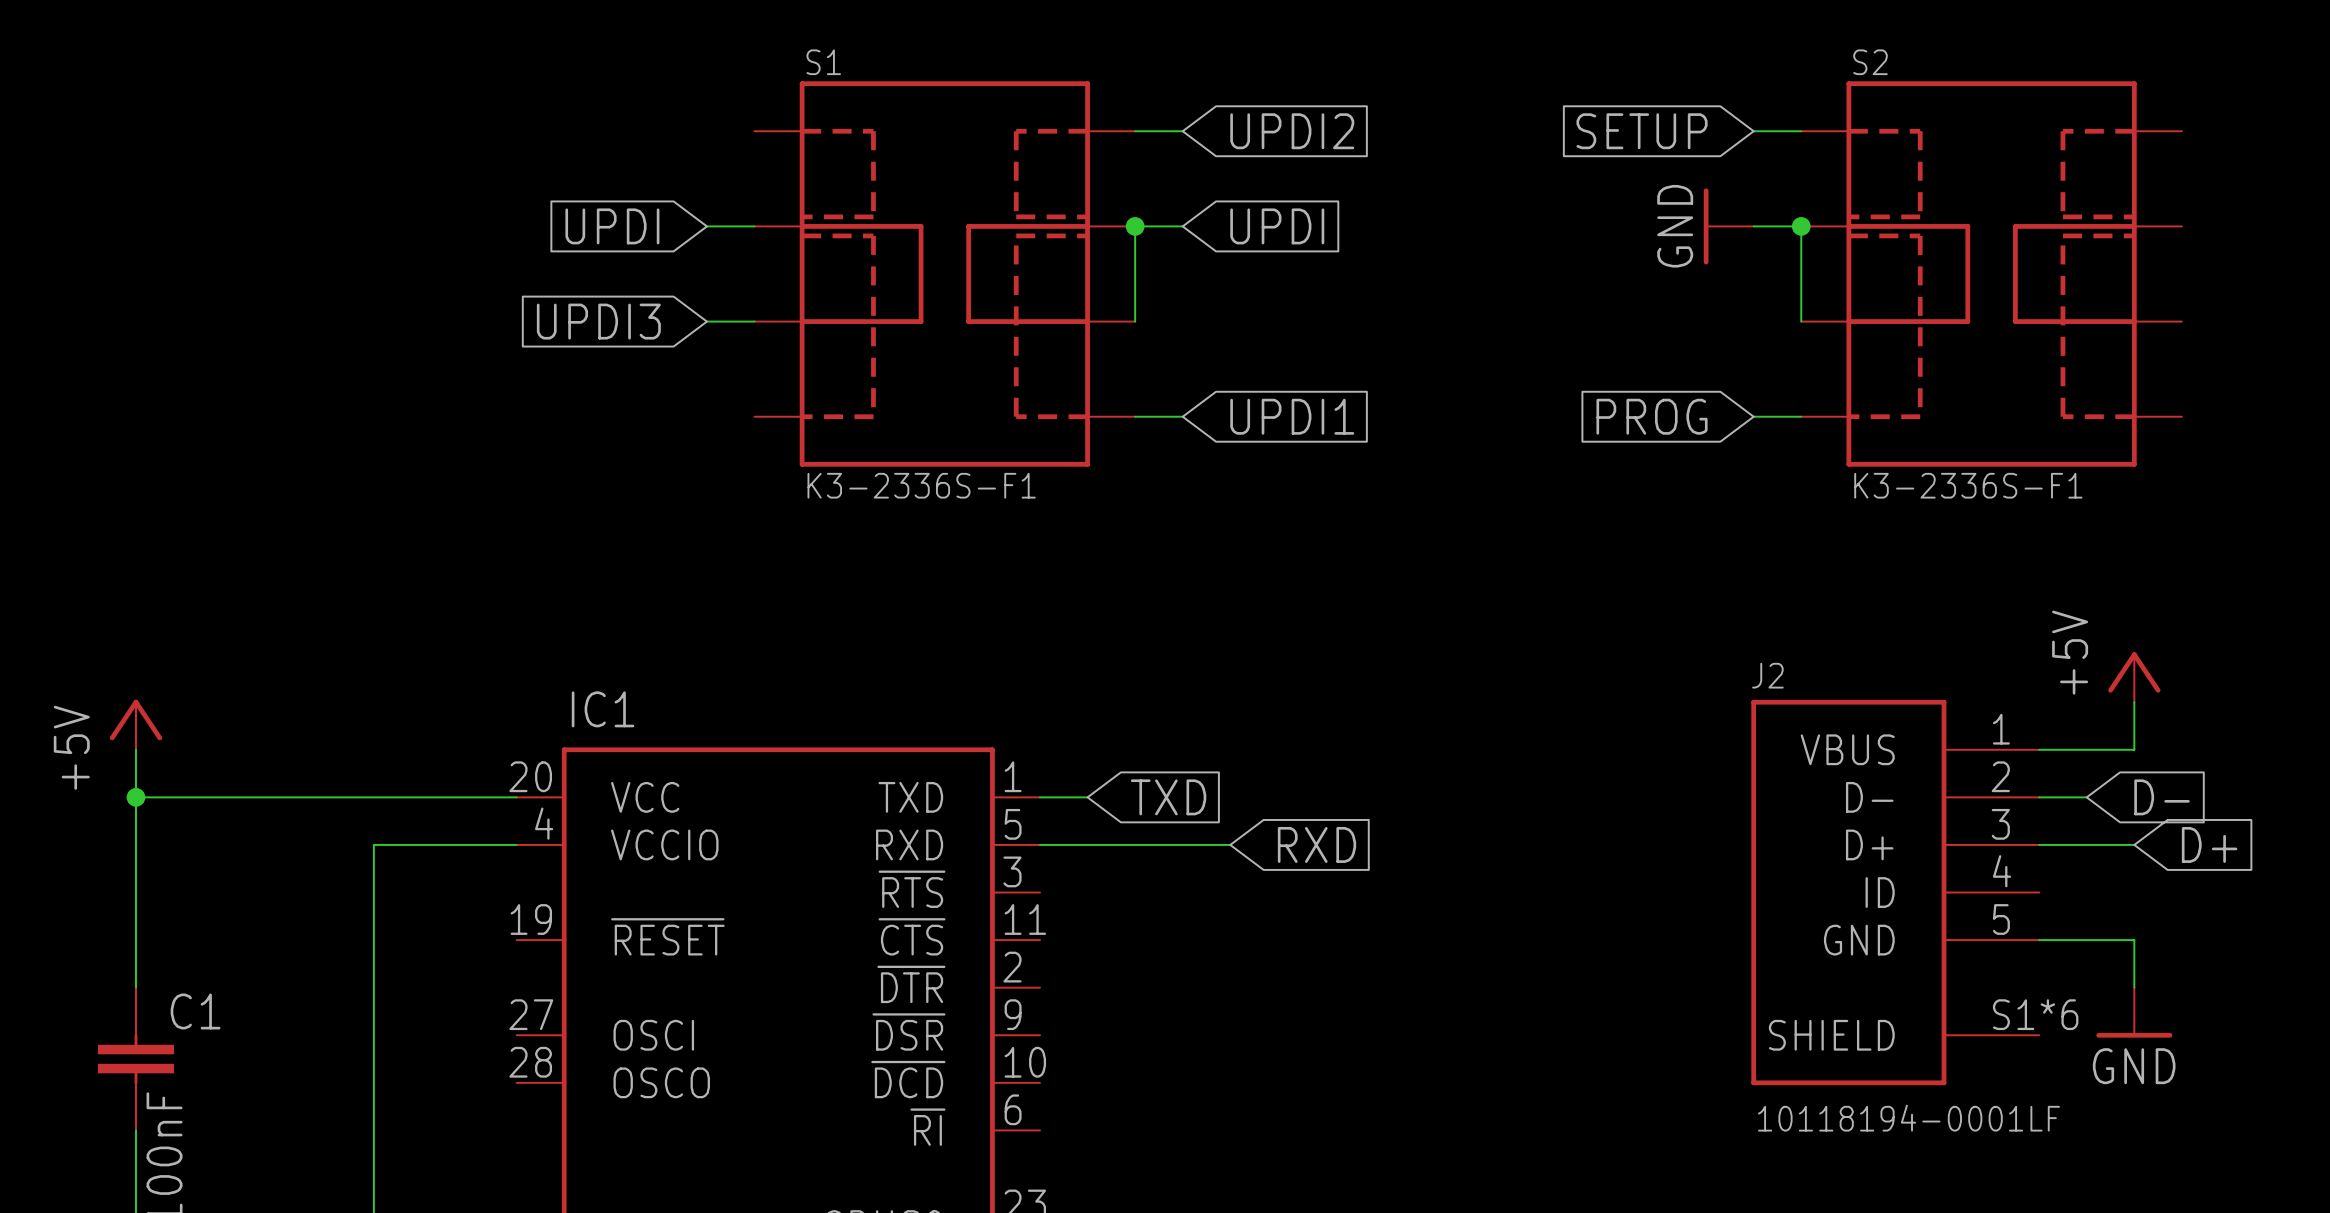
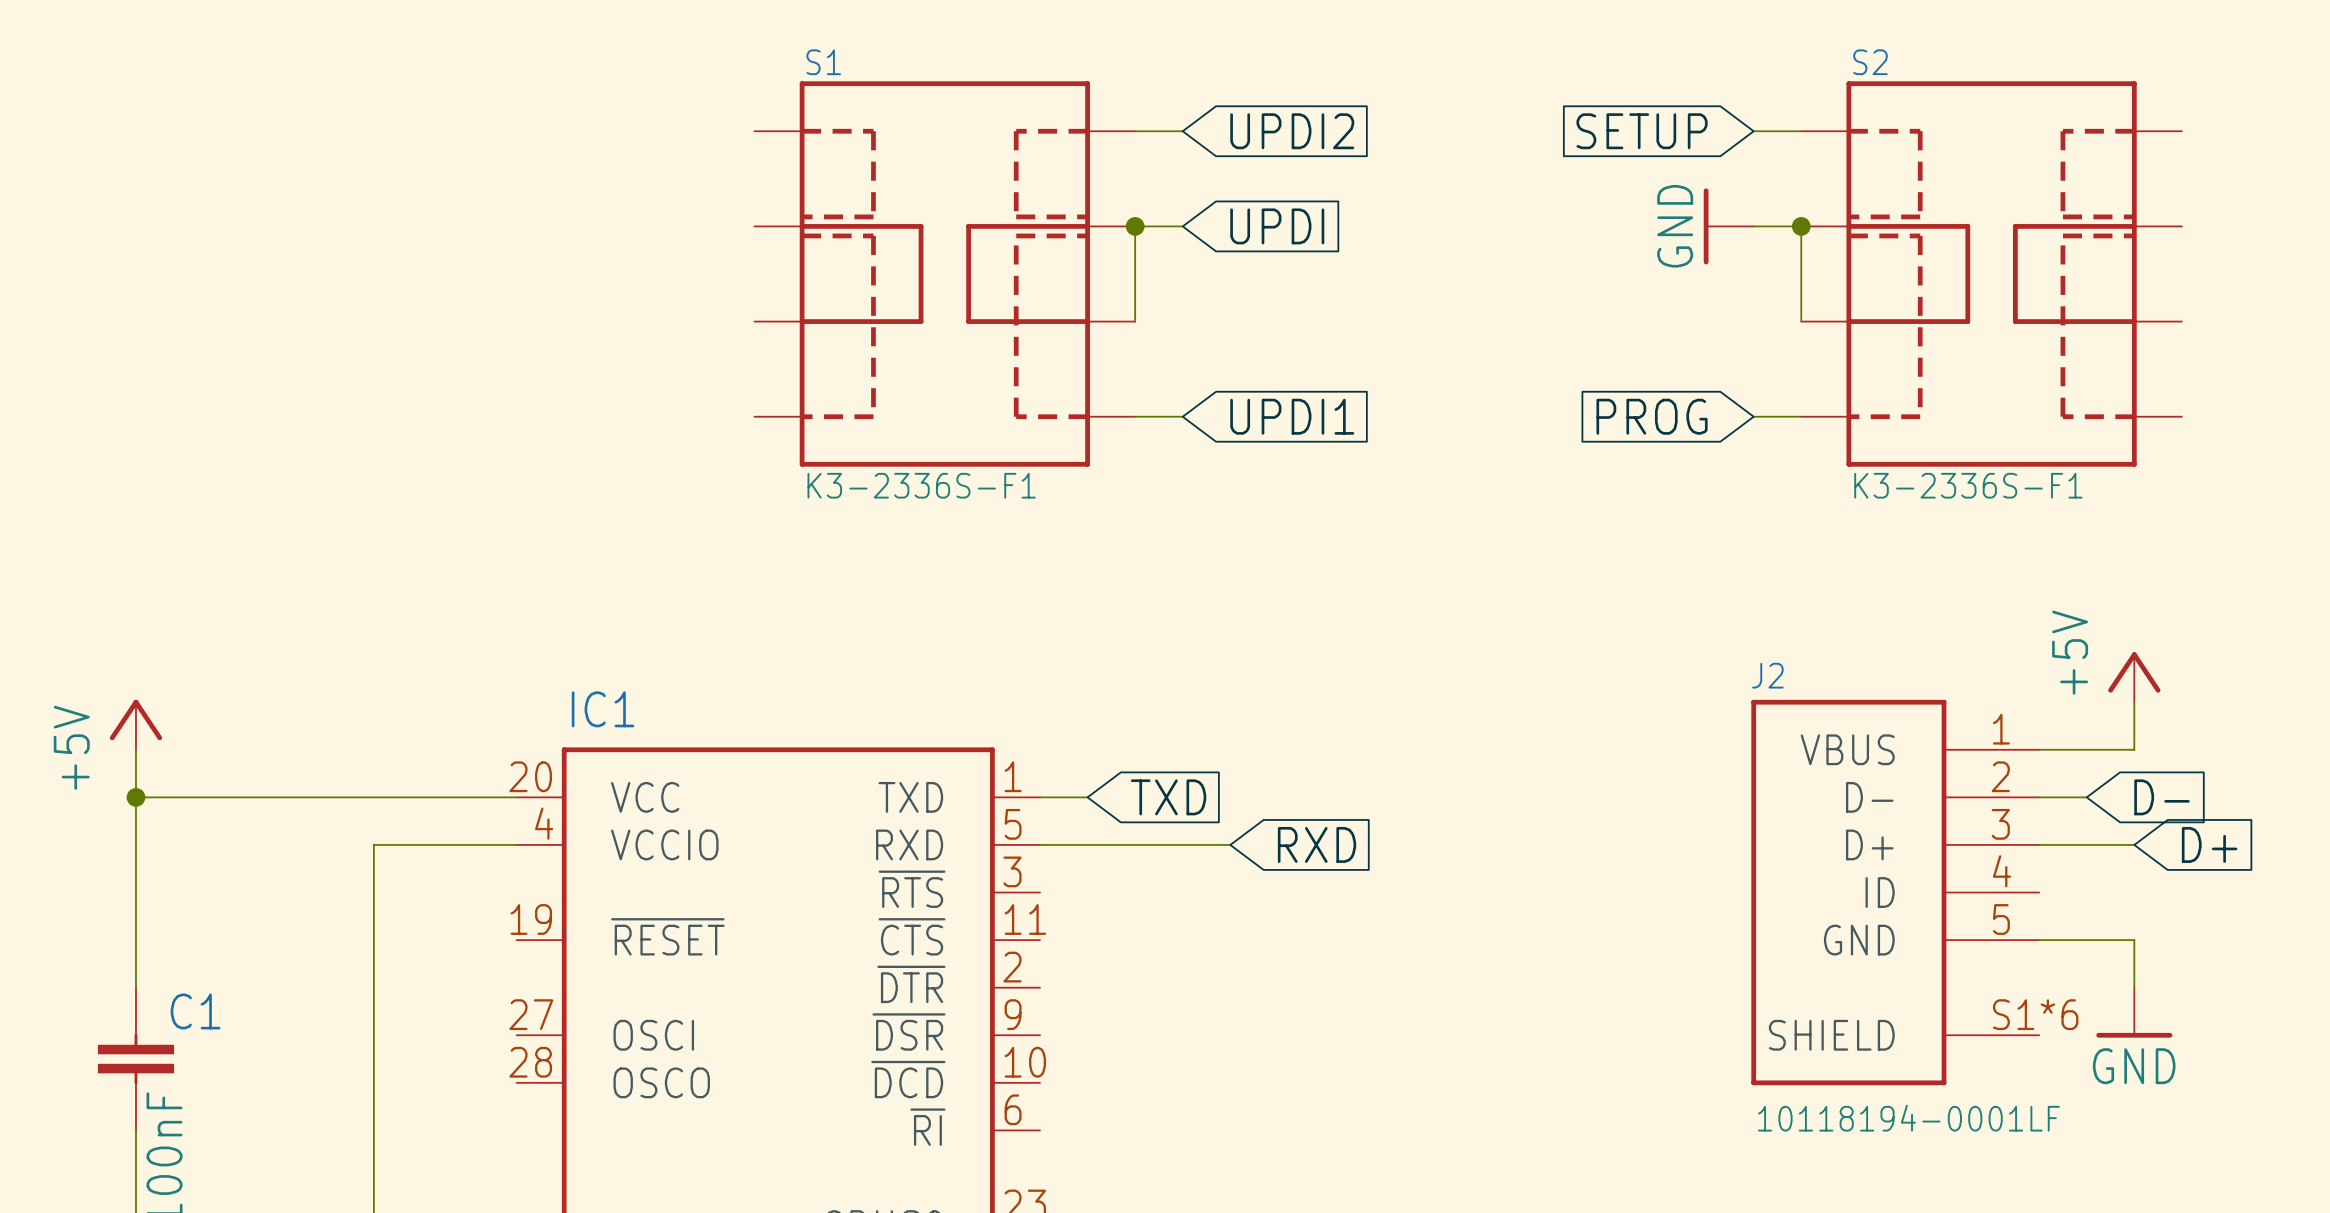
global label: UPDI (612, 226) -> none
wire: (706, 226) (754, 226) -> none
global label: UPDI3 (598, 321) -> none
wire: (706, 321) (754, 321) -> none

